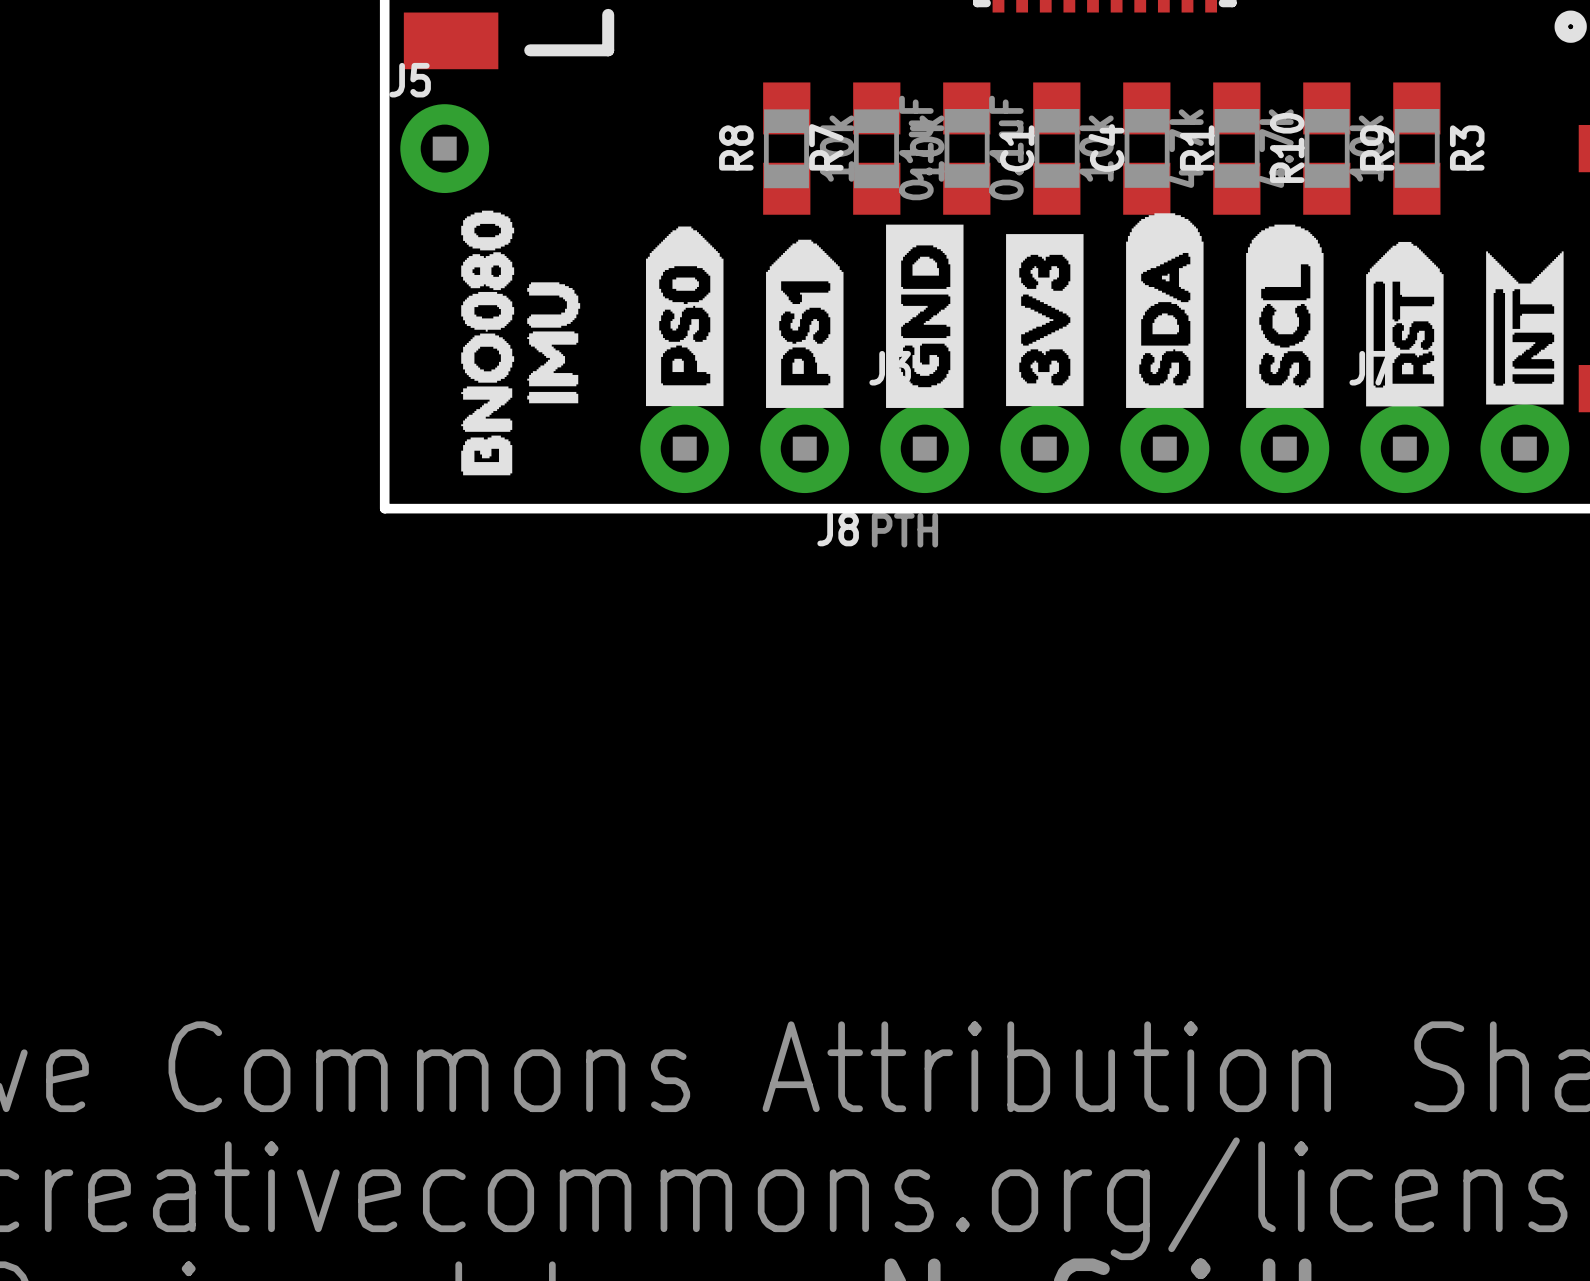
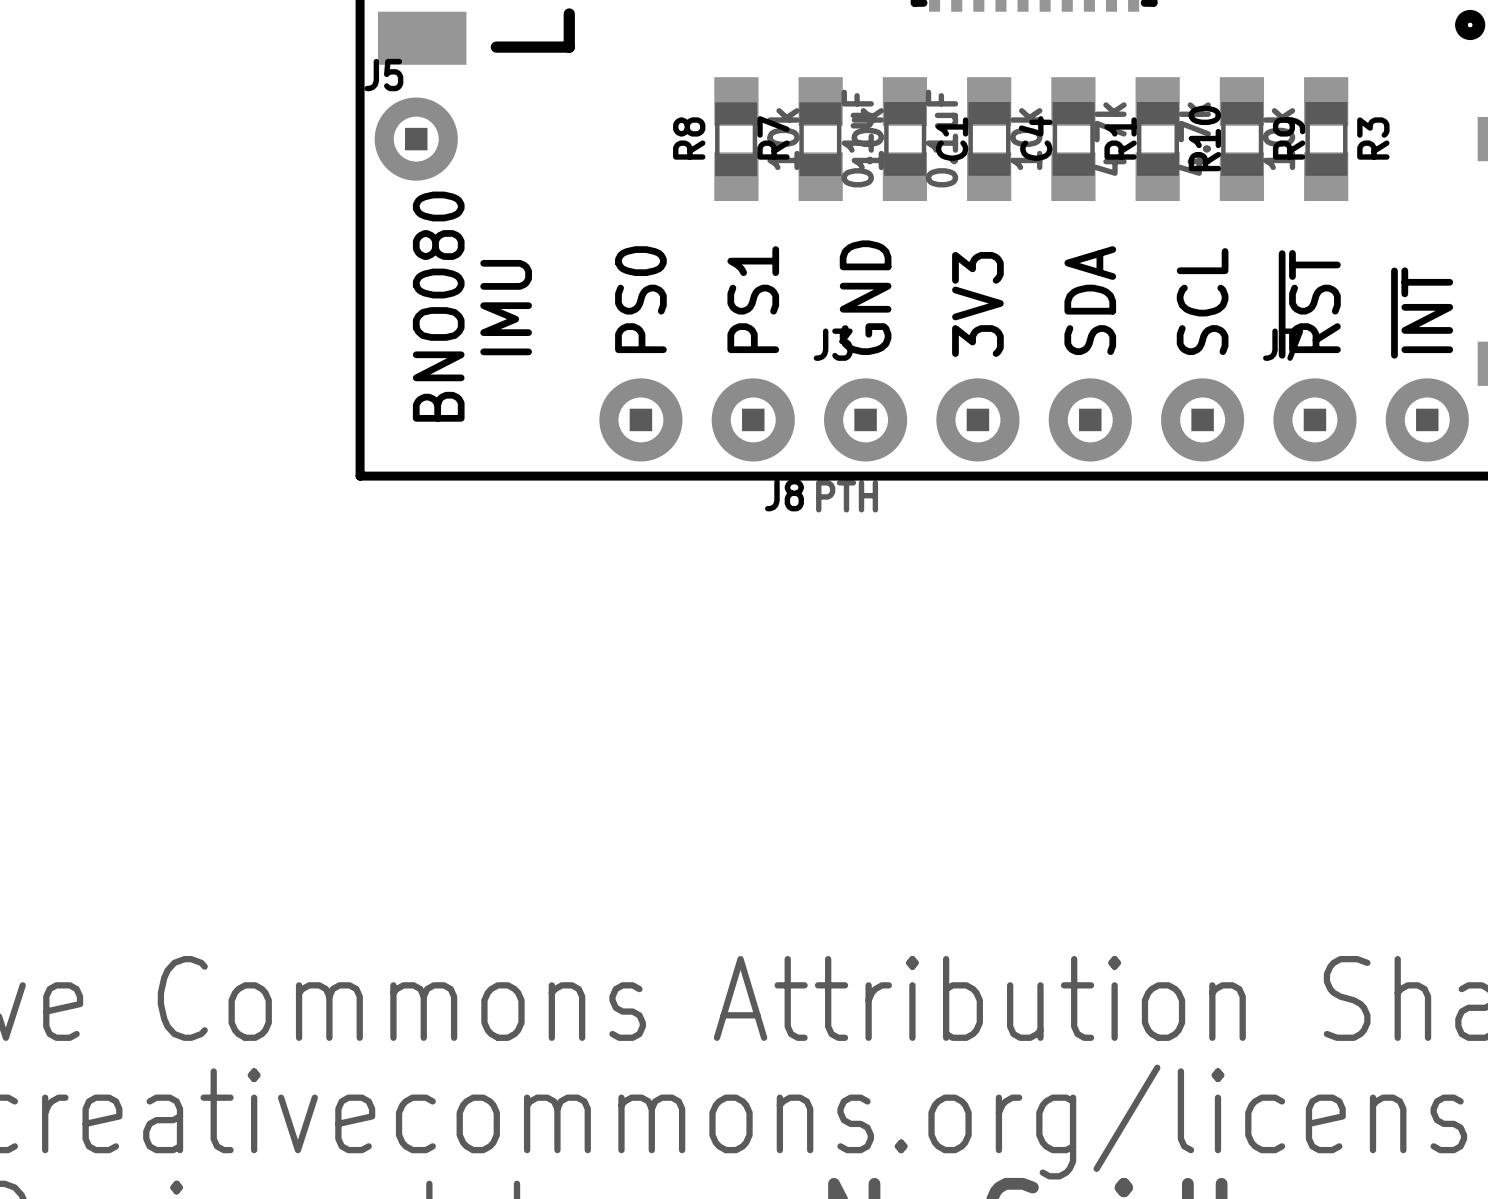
drawing: [461, 210, 581, 476] -> none
drawing: [646, 213, 1564, 408] -> none
text: none -> GND (865, 297)
text: none -> PS0 (640, 299)
text: none -> PS1 (753, 299)
text: none -> SDA (1090, 300)
text: none -> SCL (1202, 301)
text: none -> 3V3 (977, 304)
text: none -> ~{RST} (1309, 304)
text: none -> BNO080 (438, 306)
text: none -> IMU (506, 307)
text: none -> ~{INT} (1422, 313)

